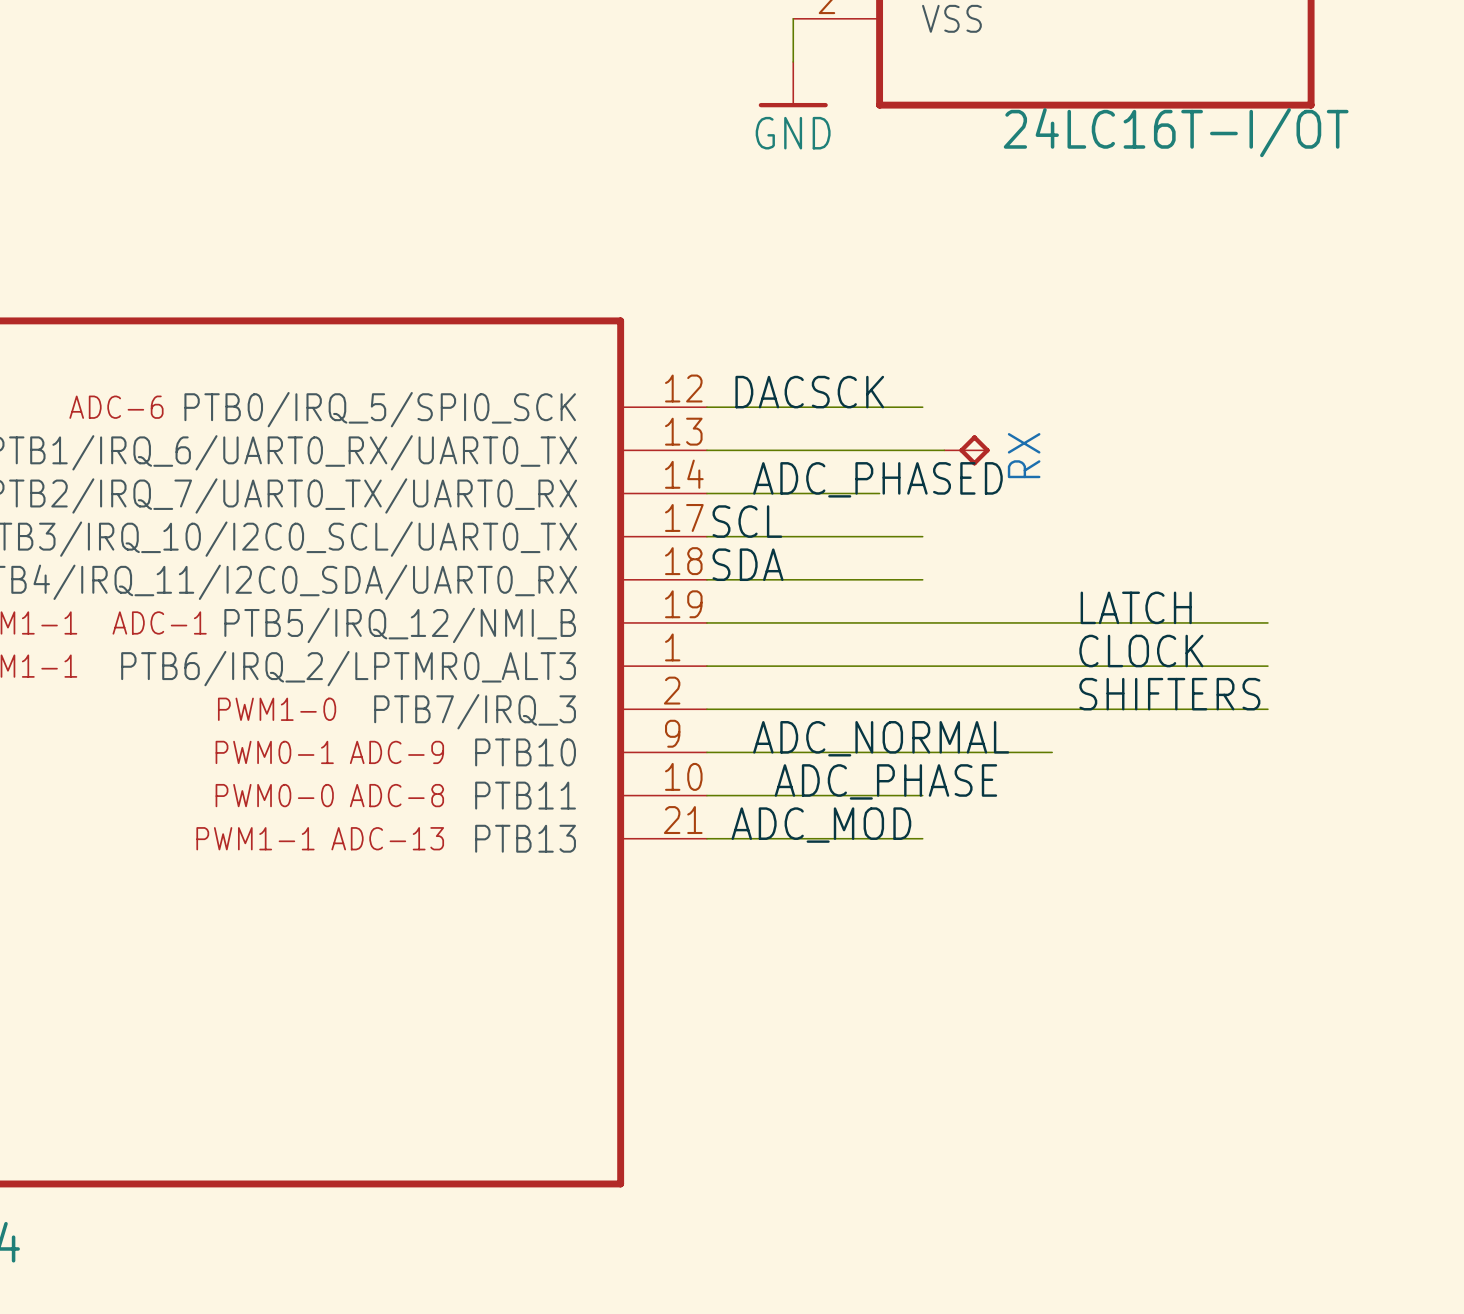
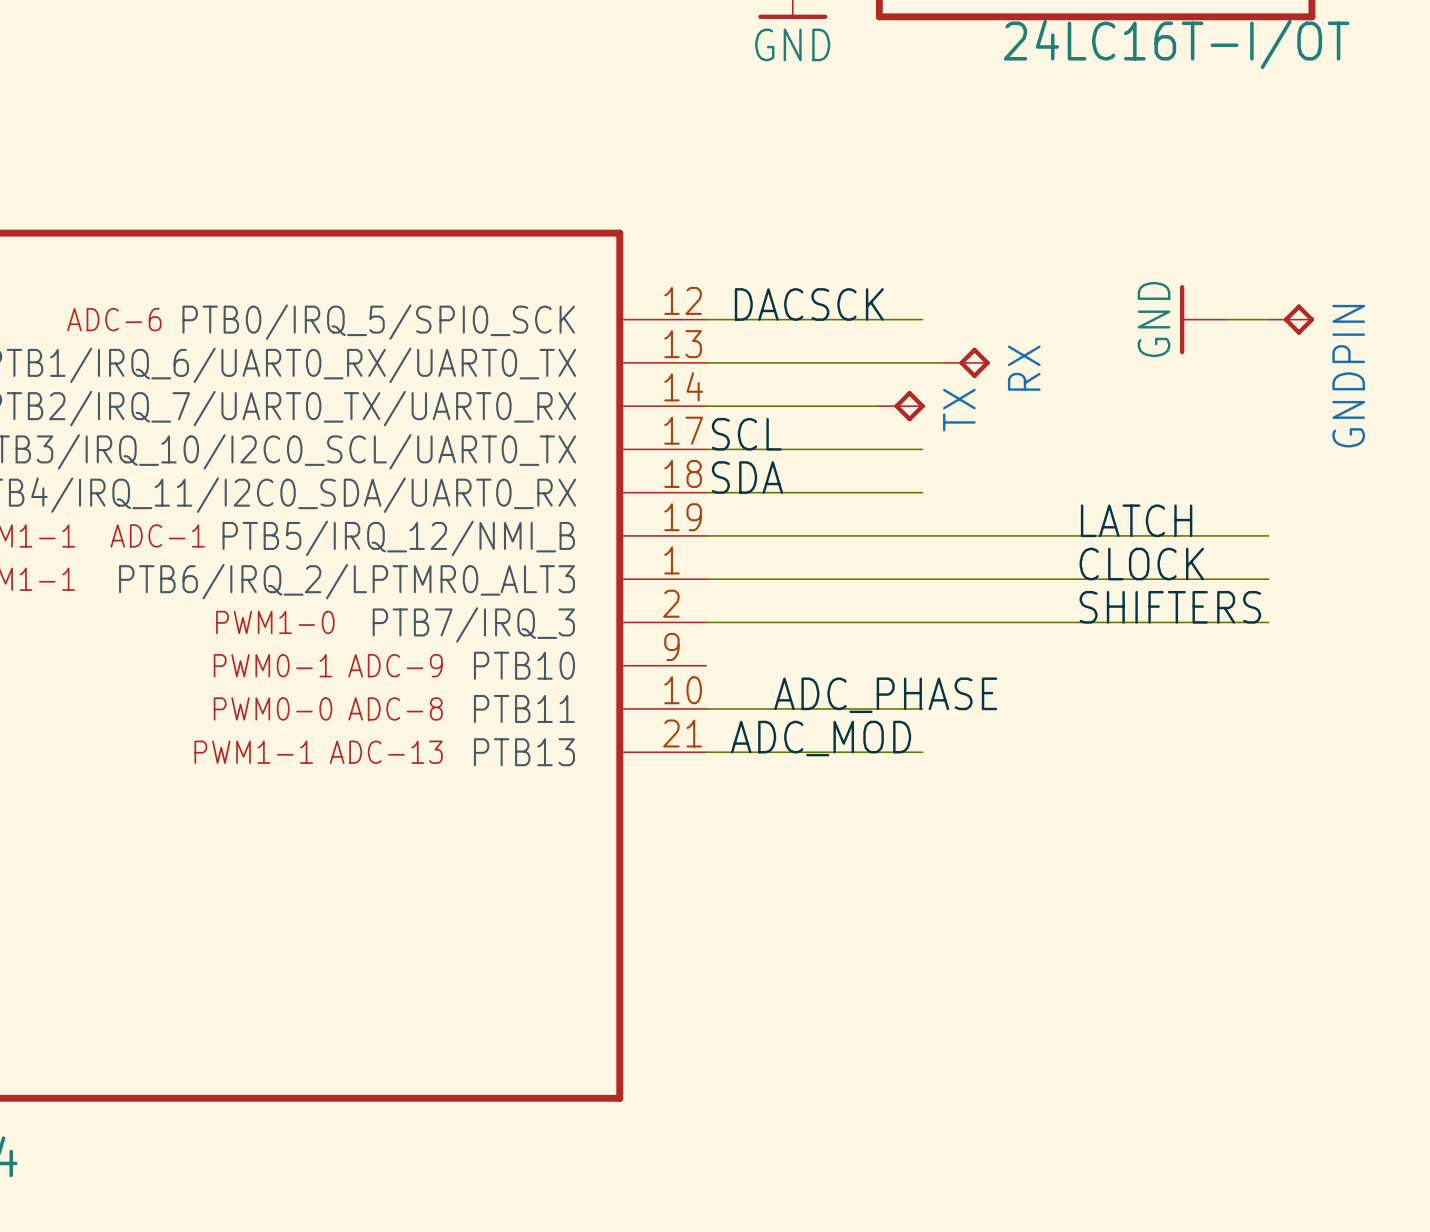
power symbol: none -> GND (1202, 319)
wire: none -> (1225, 319) (1268, 319)
GNDPIN: none -> (1291, 319)
label: ADC_PHASED (877, 479) -> none
TX: none -> (902, 406)
label: ADC_NORMAL (881, 738) -> none
wire: (706, 752) (1052, 752) -> none

